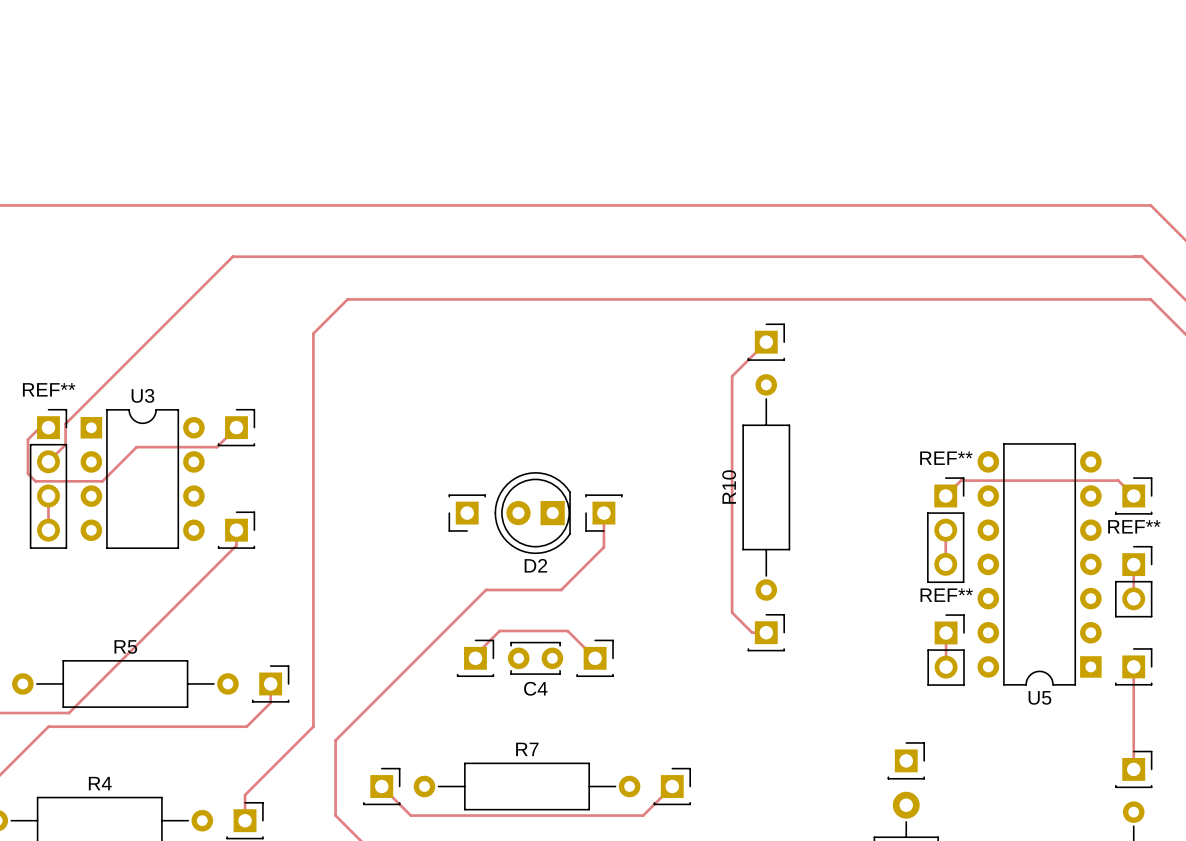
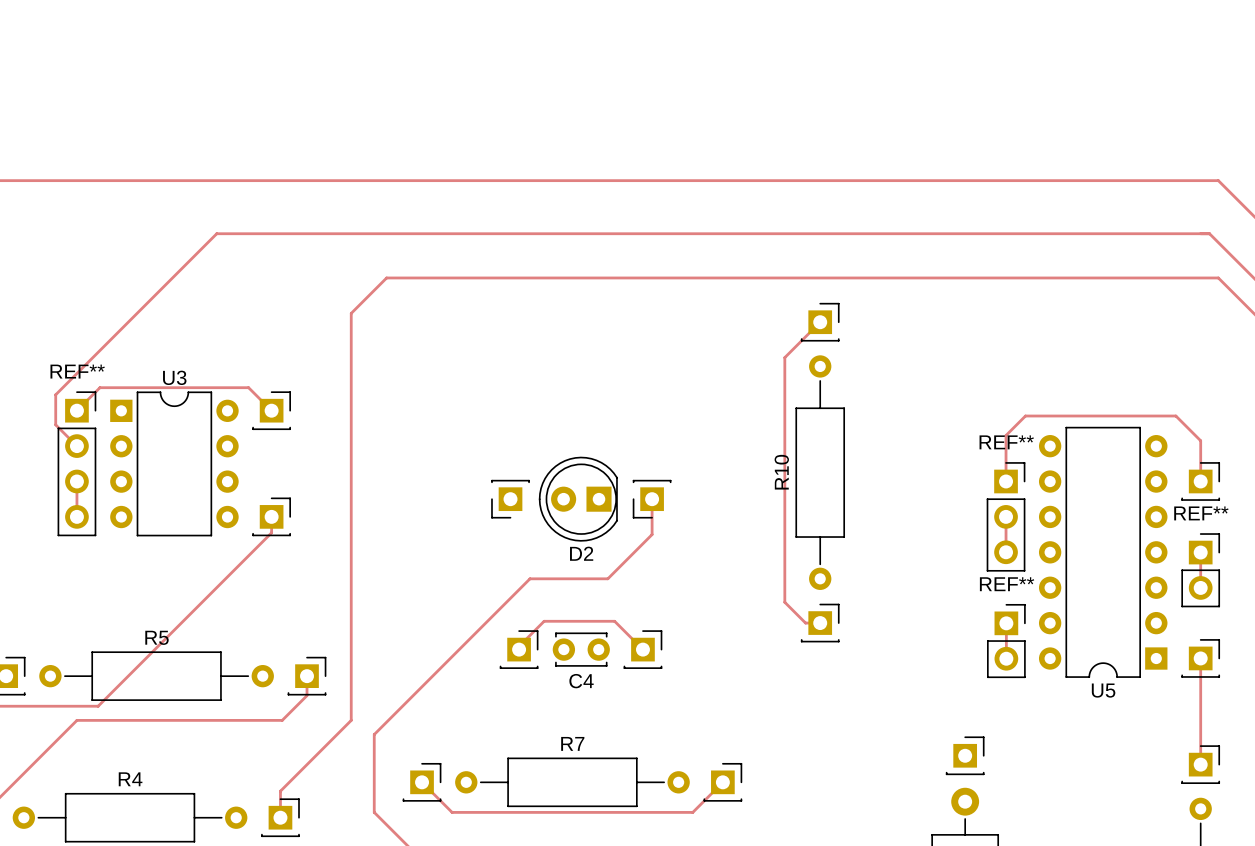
track: (232, 256) (65, 423) (65, 444) (48, 461) -> (267, 233) (216, 233) (55, 394) (55, 423)
track: (48, 427) (39, 427) (27, 439) -> none
track: (236, 427) (216, 447) (136, 447) (102, 481) (35, 481) (27, 473) (27, 441) -> (271, 410) (248, 387) (99, 387) (76, 410)
track: none -> (55, 424) (76, 446)
track: (945, 495) (961, 480) (1118, 480) (1133, 495) -> (1006, 481) (1006, 435) (1025, 416) (1175, 416) (1200, 440) (1200, 481)

